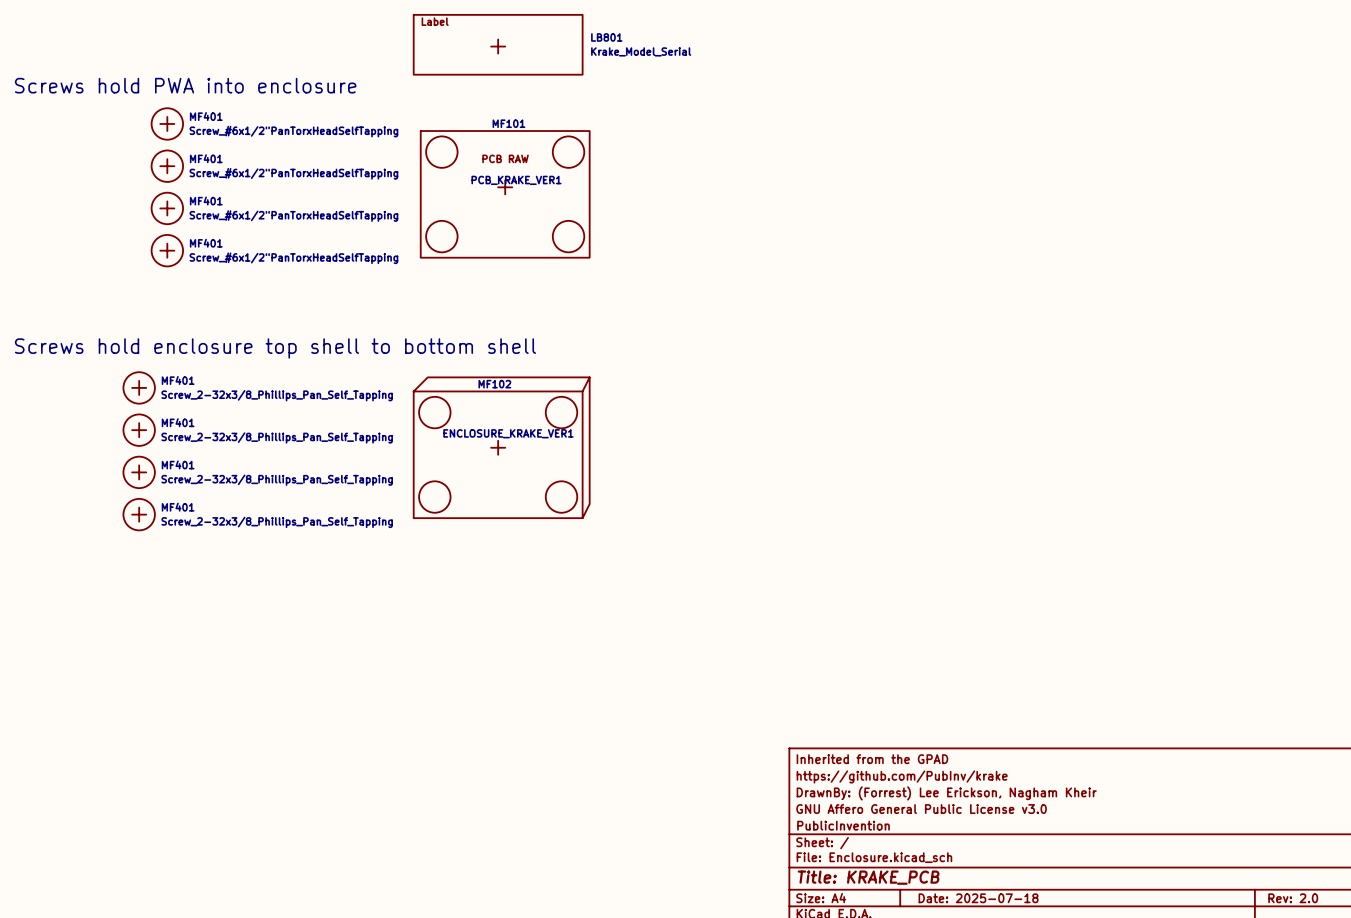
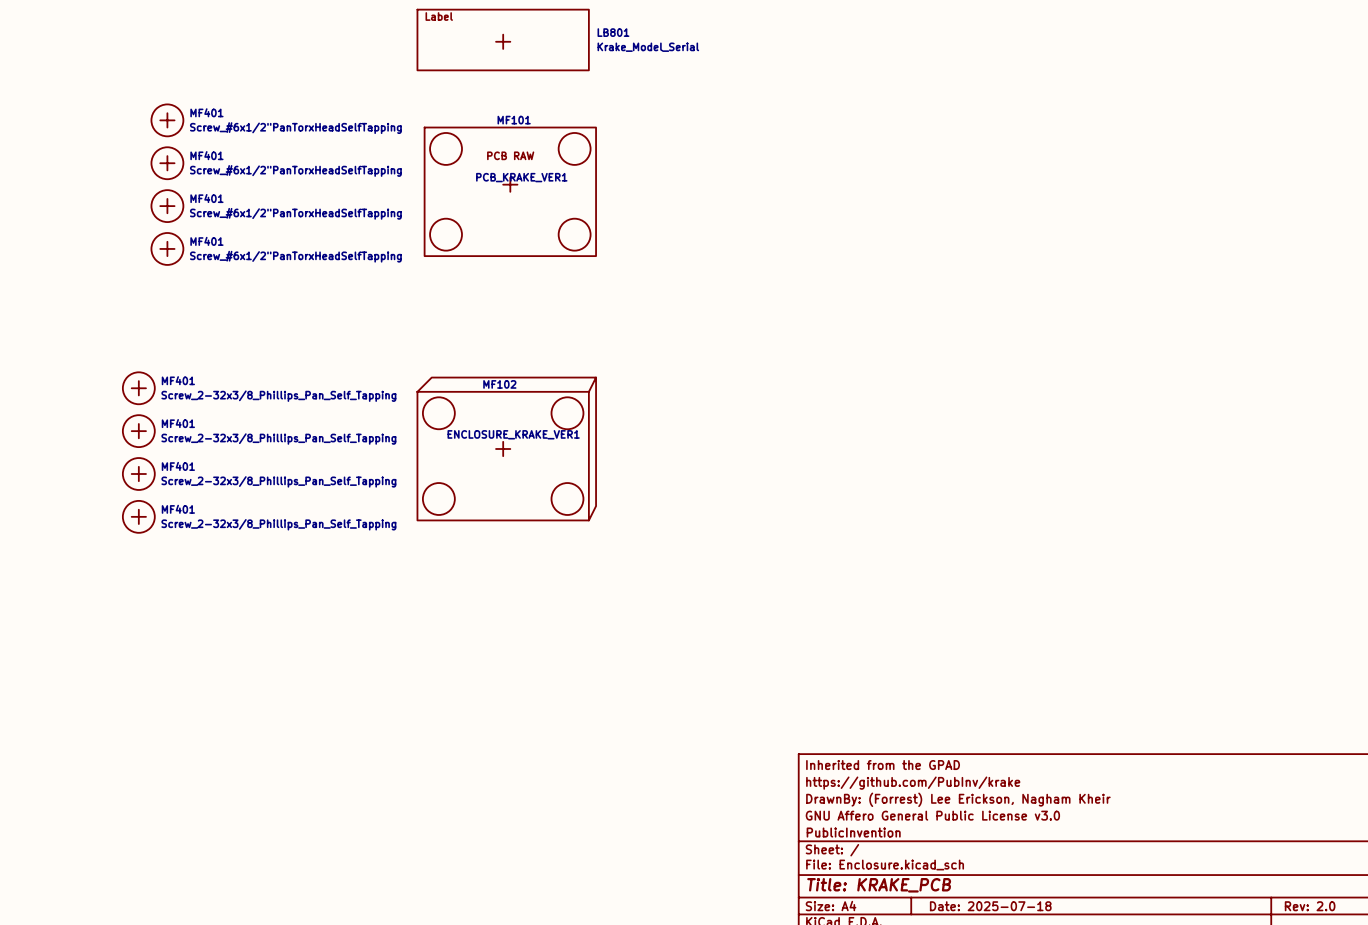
text: Screws hold PWA into enclosure (185, 85) -> none
text: Screws hold enclosure top shell to bottom shell (275, 348) -> none

